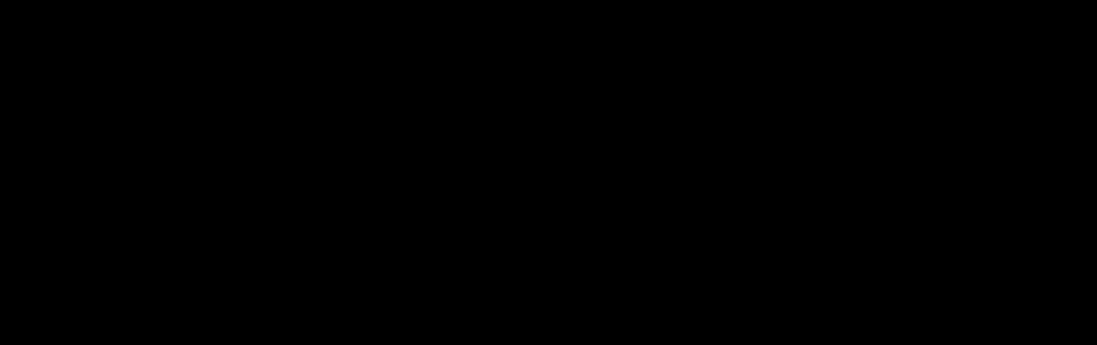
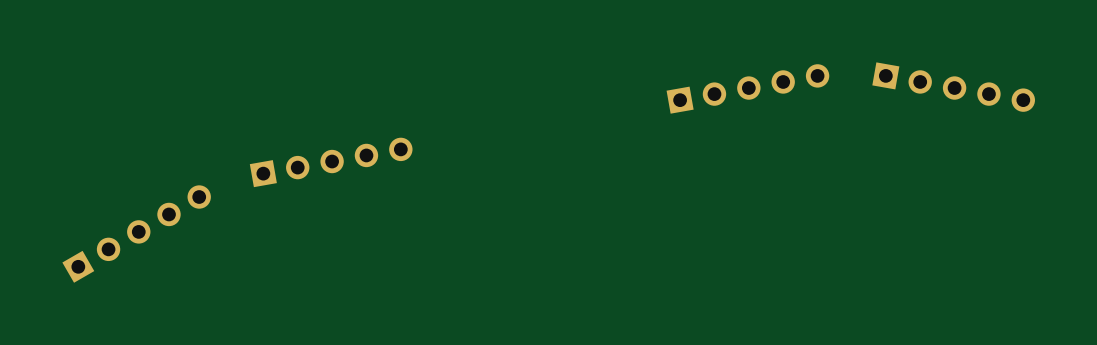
part: none -> (953, 87)
part: none -> (747, 88)
part: none -> (331, 162)
part: none -> (136, 234)

